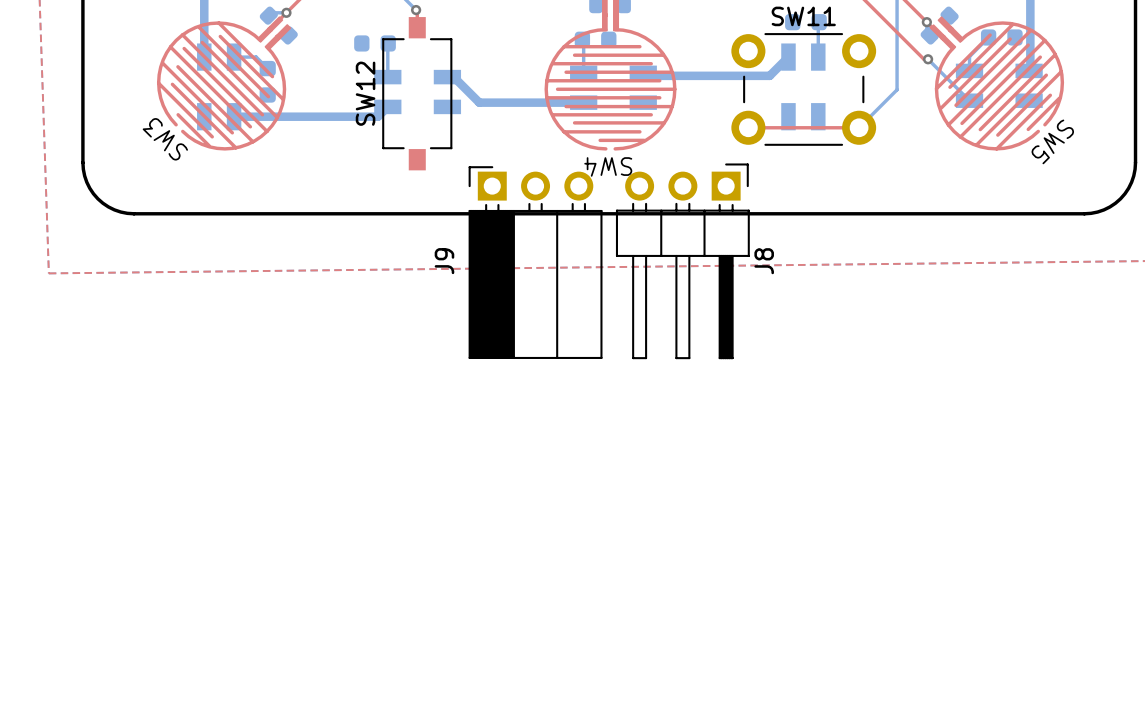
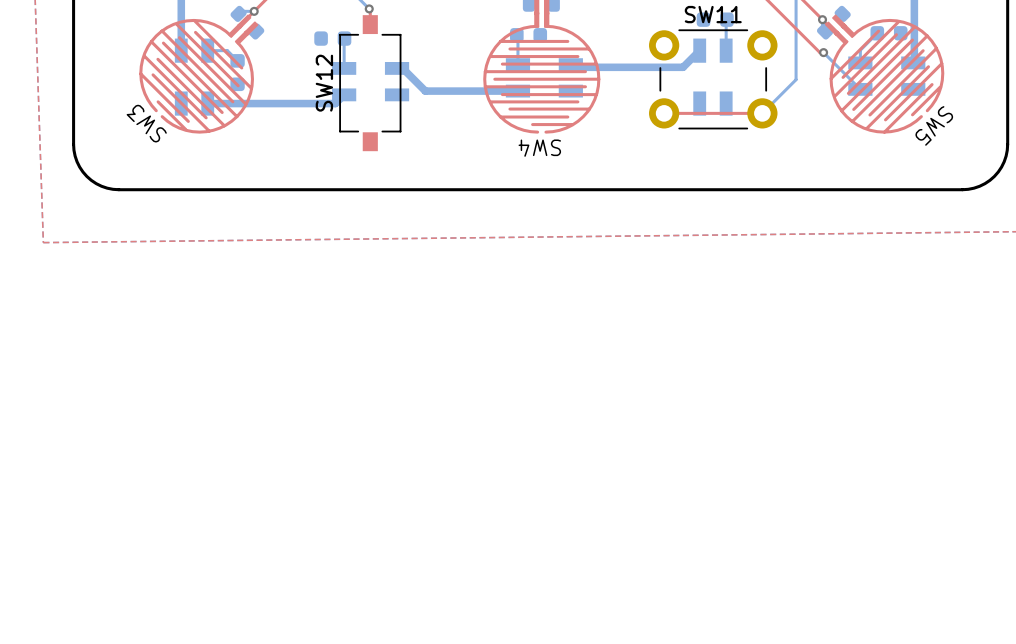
J8: (682, 261) -> none
J9: (535, 262) -> none

